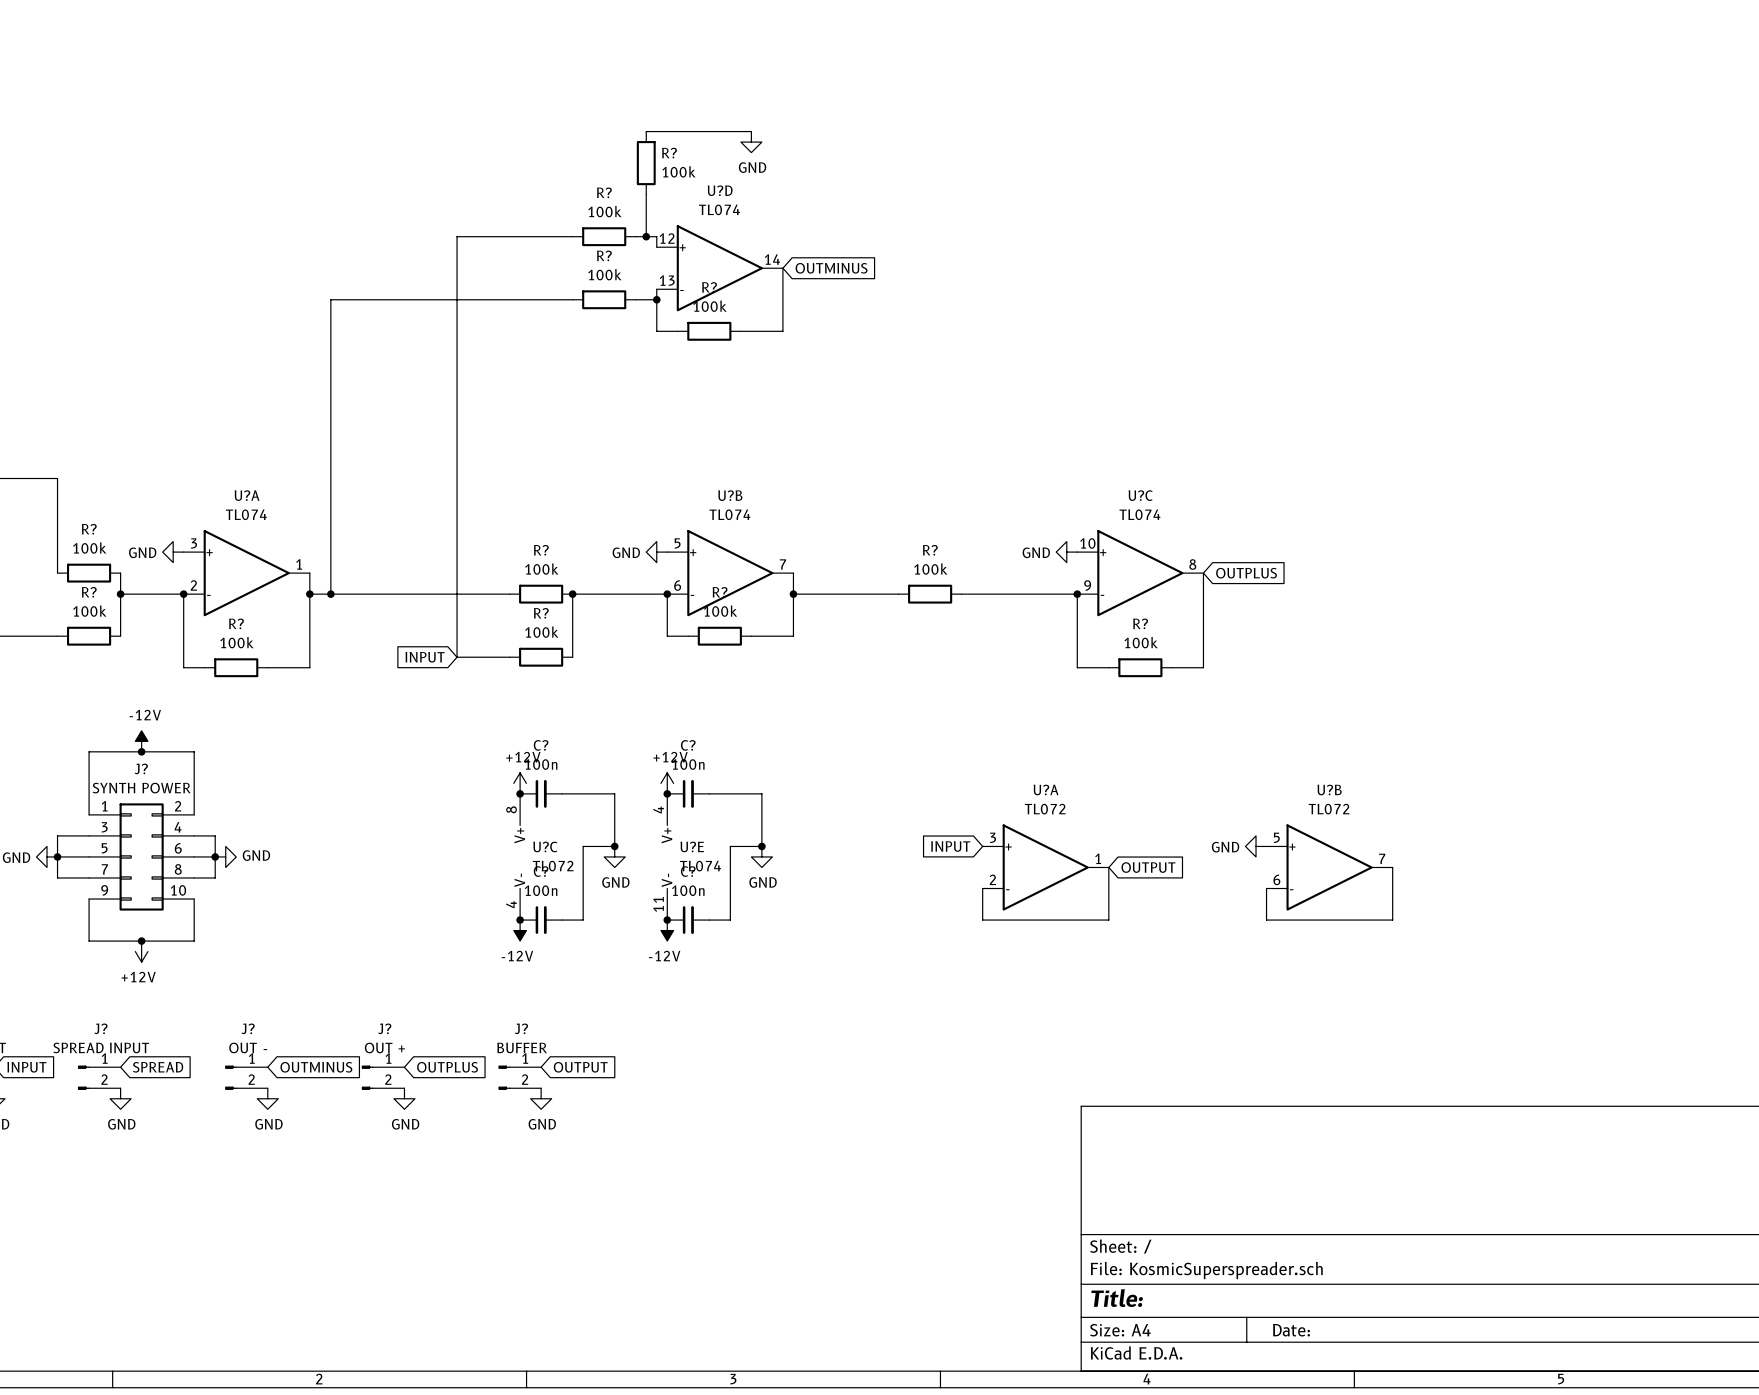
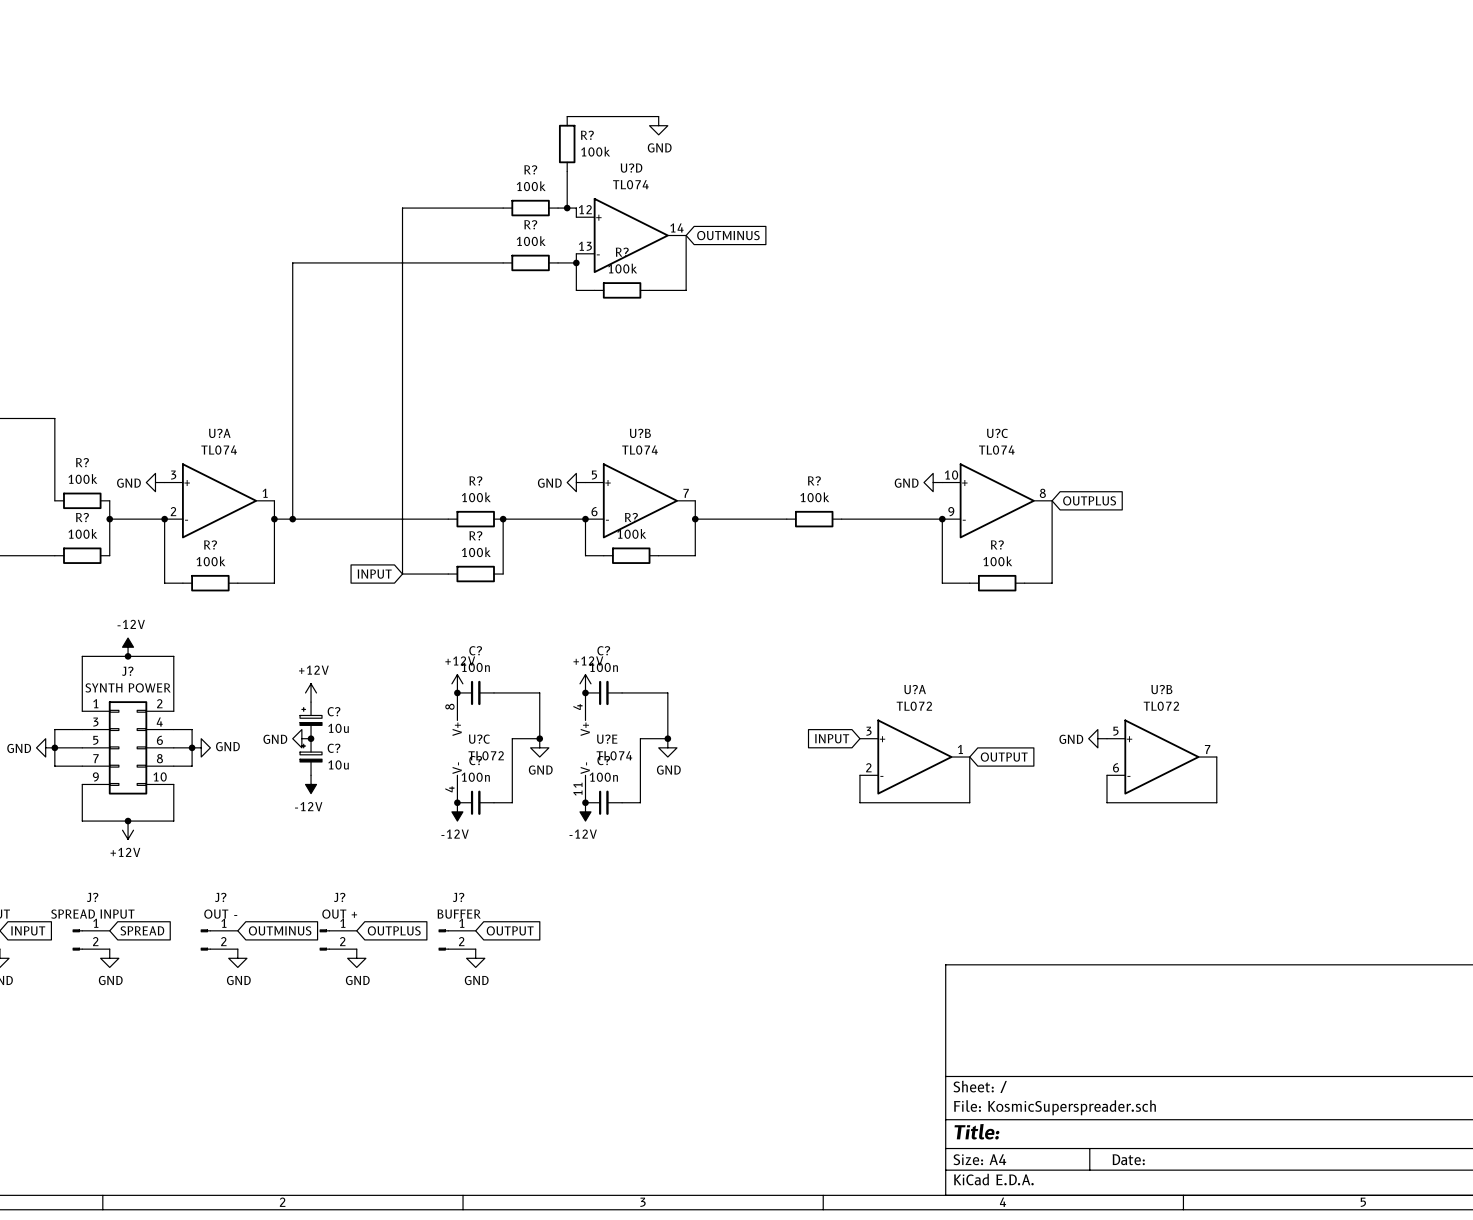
power symbol: none -> +12V (311, 692)
C?: none -> 10u (311, 720)
power symbol: none -> GND (301, 738)
junction: none -> (311, 738)
C?: none -> 10u (311, 757)
power symbol: none -> -12V (311, 784)

